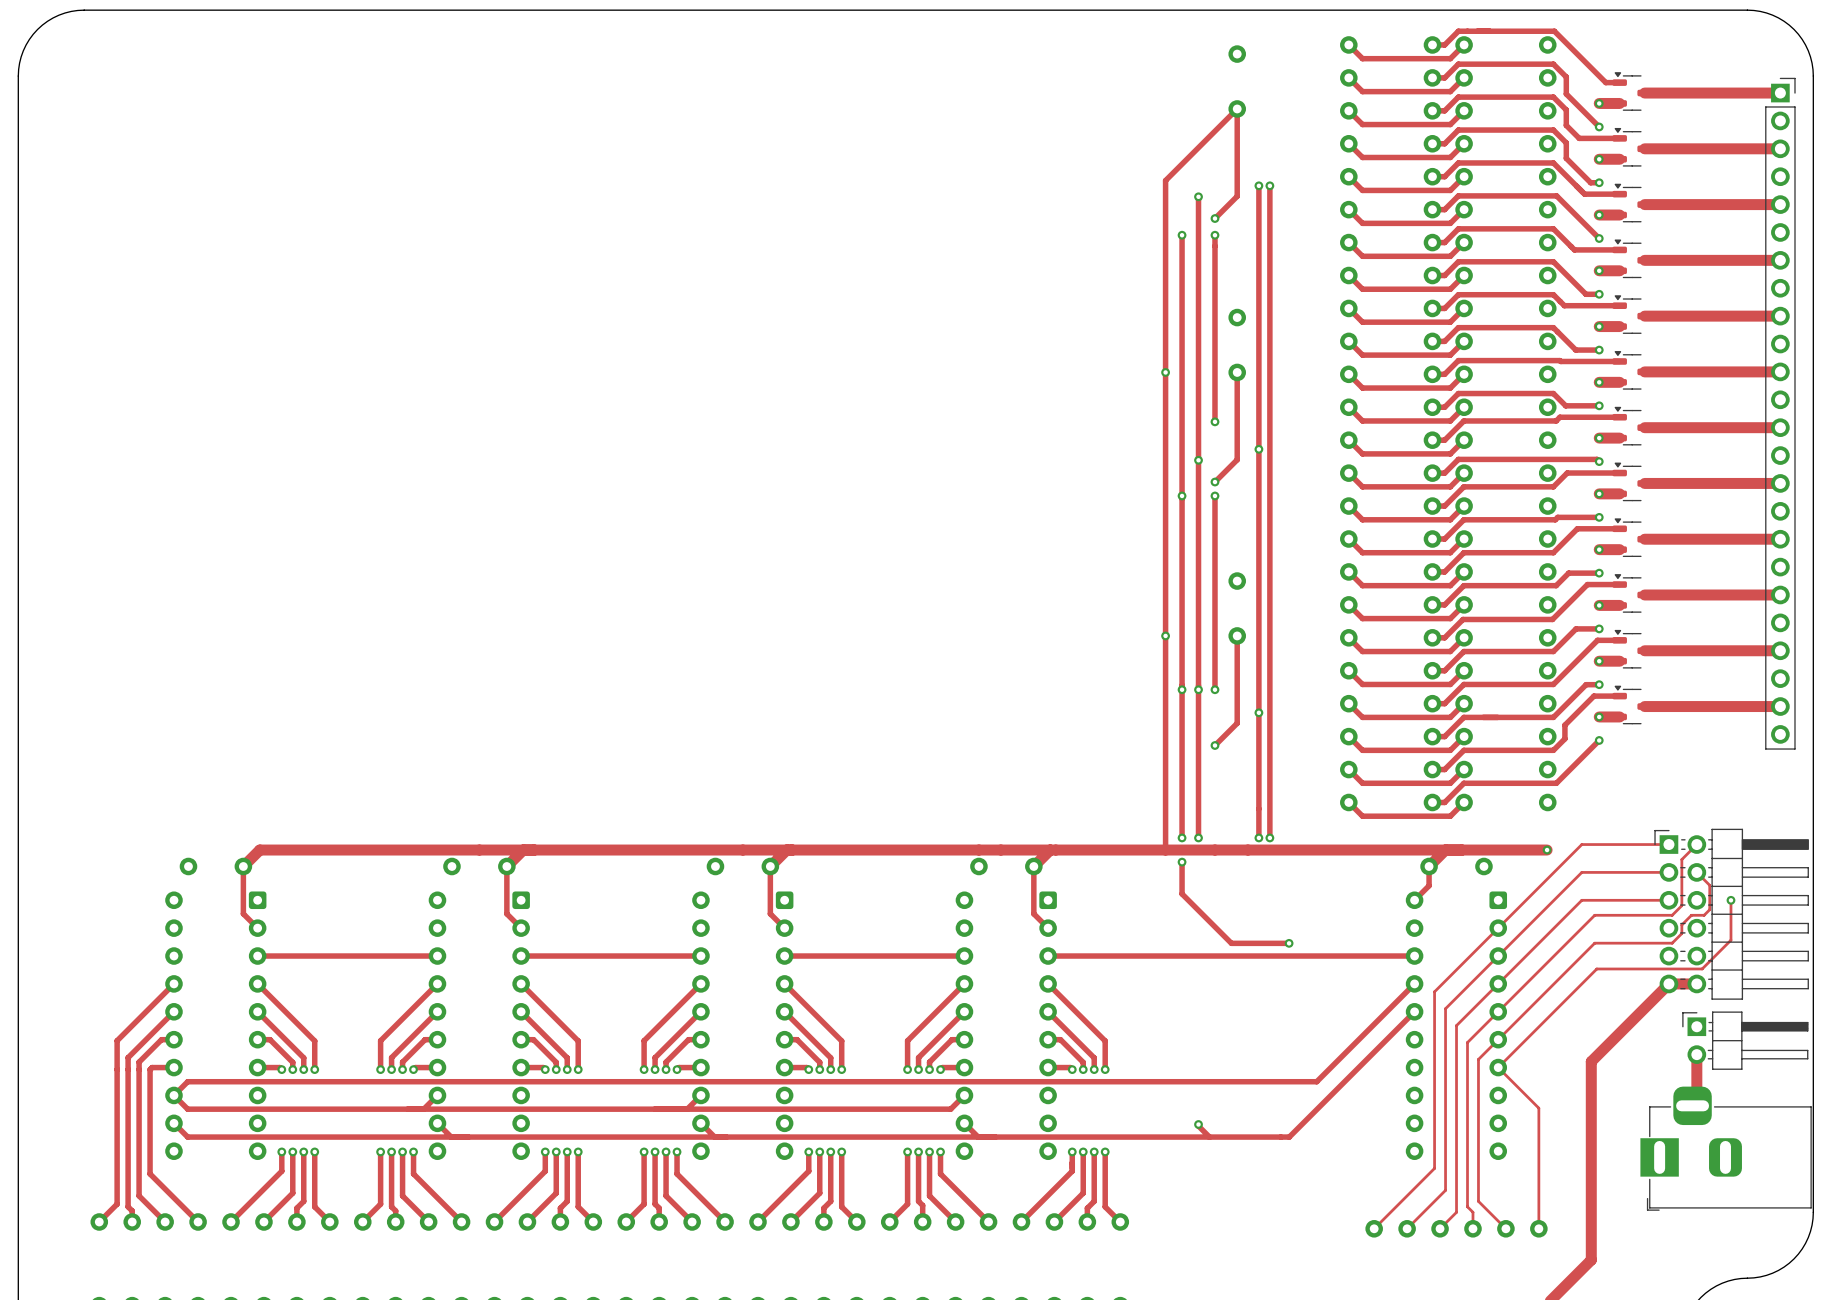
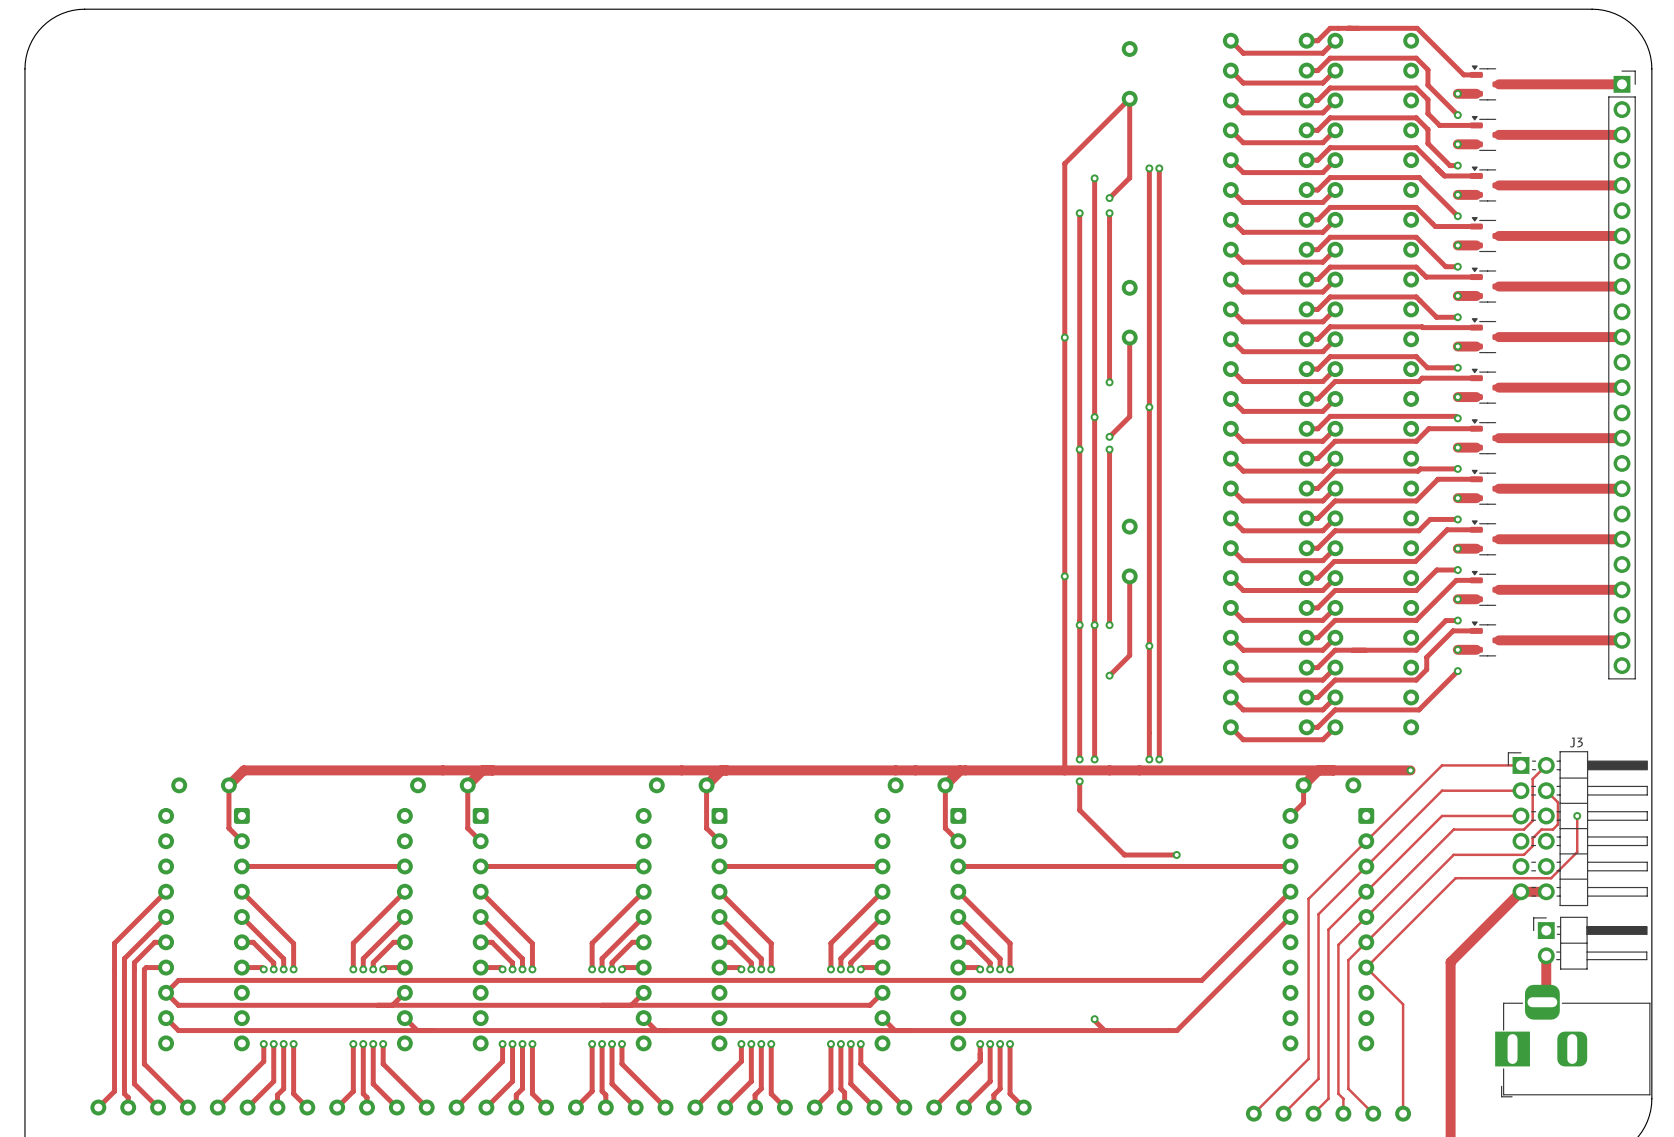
J3 name: none -> J3 (1576, 742)

